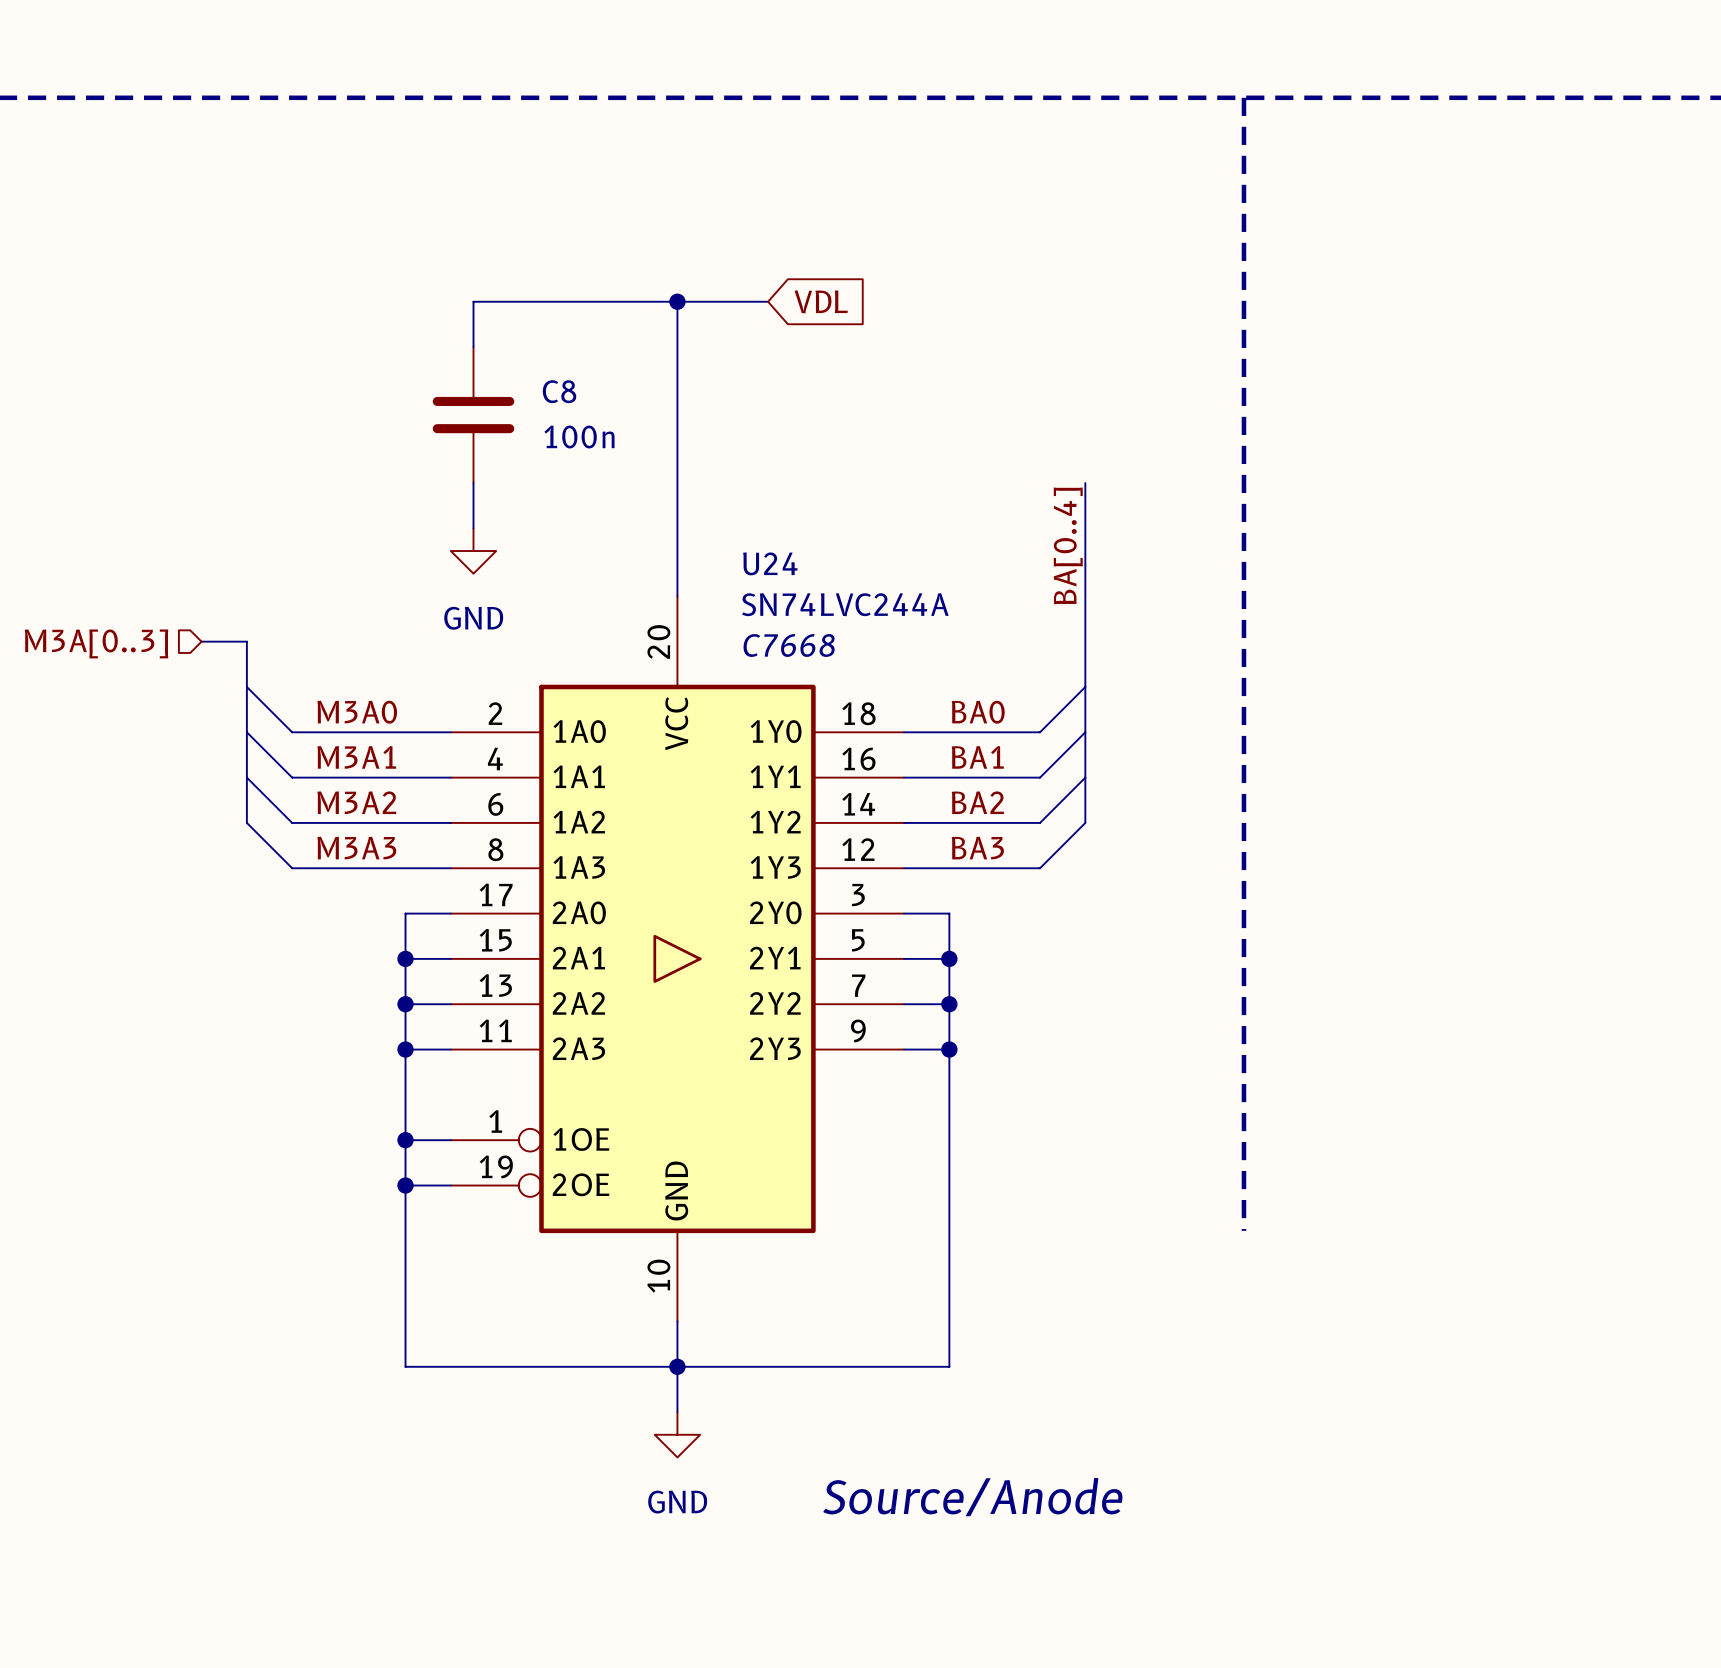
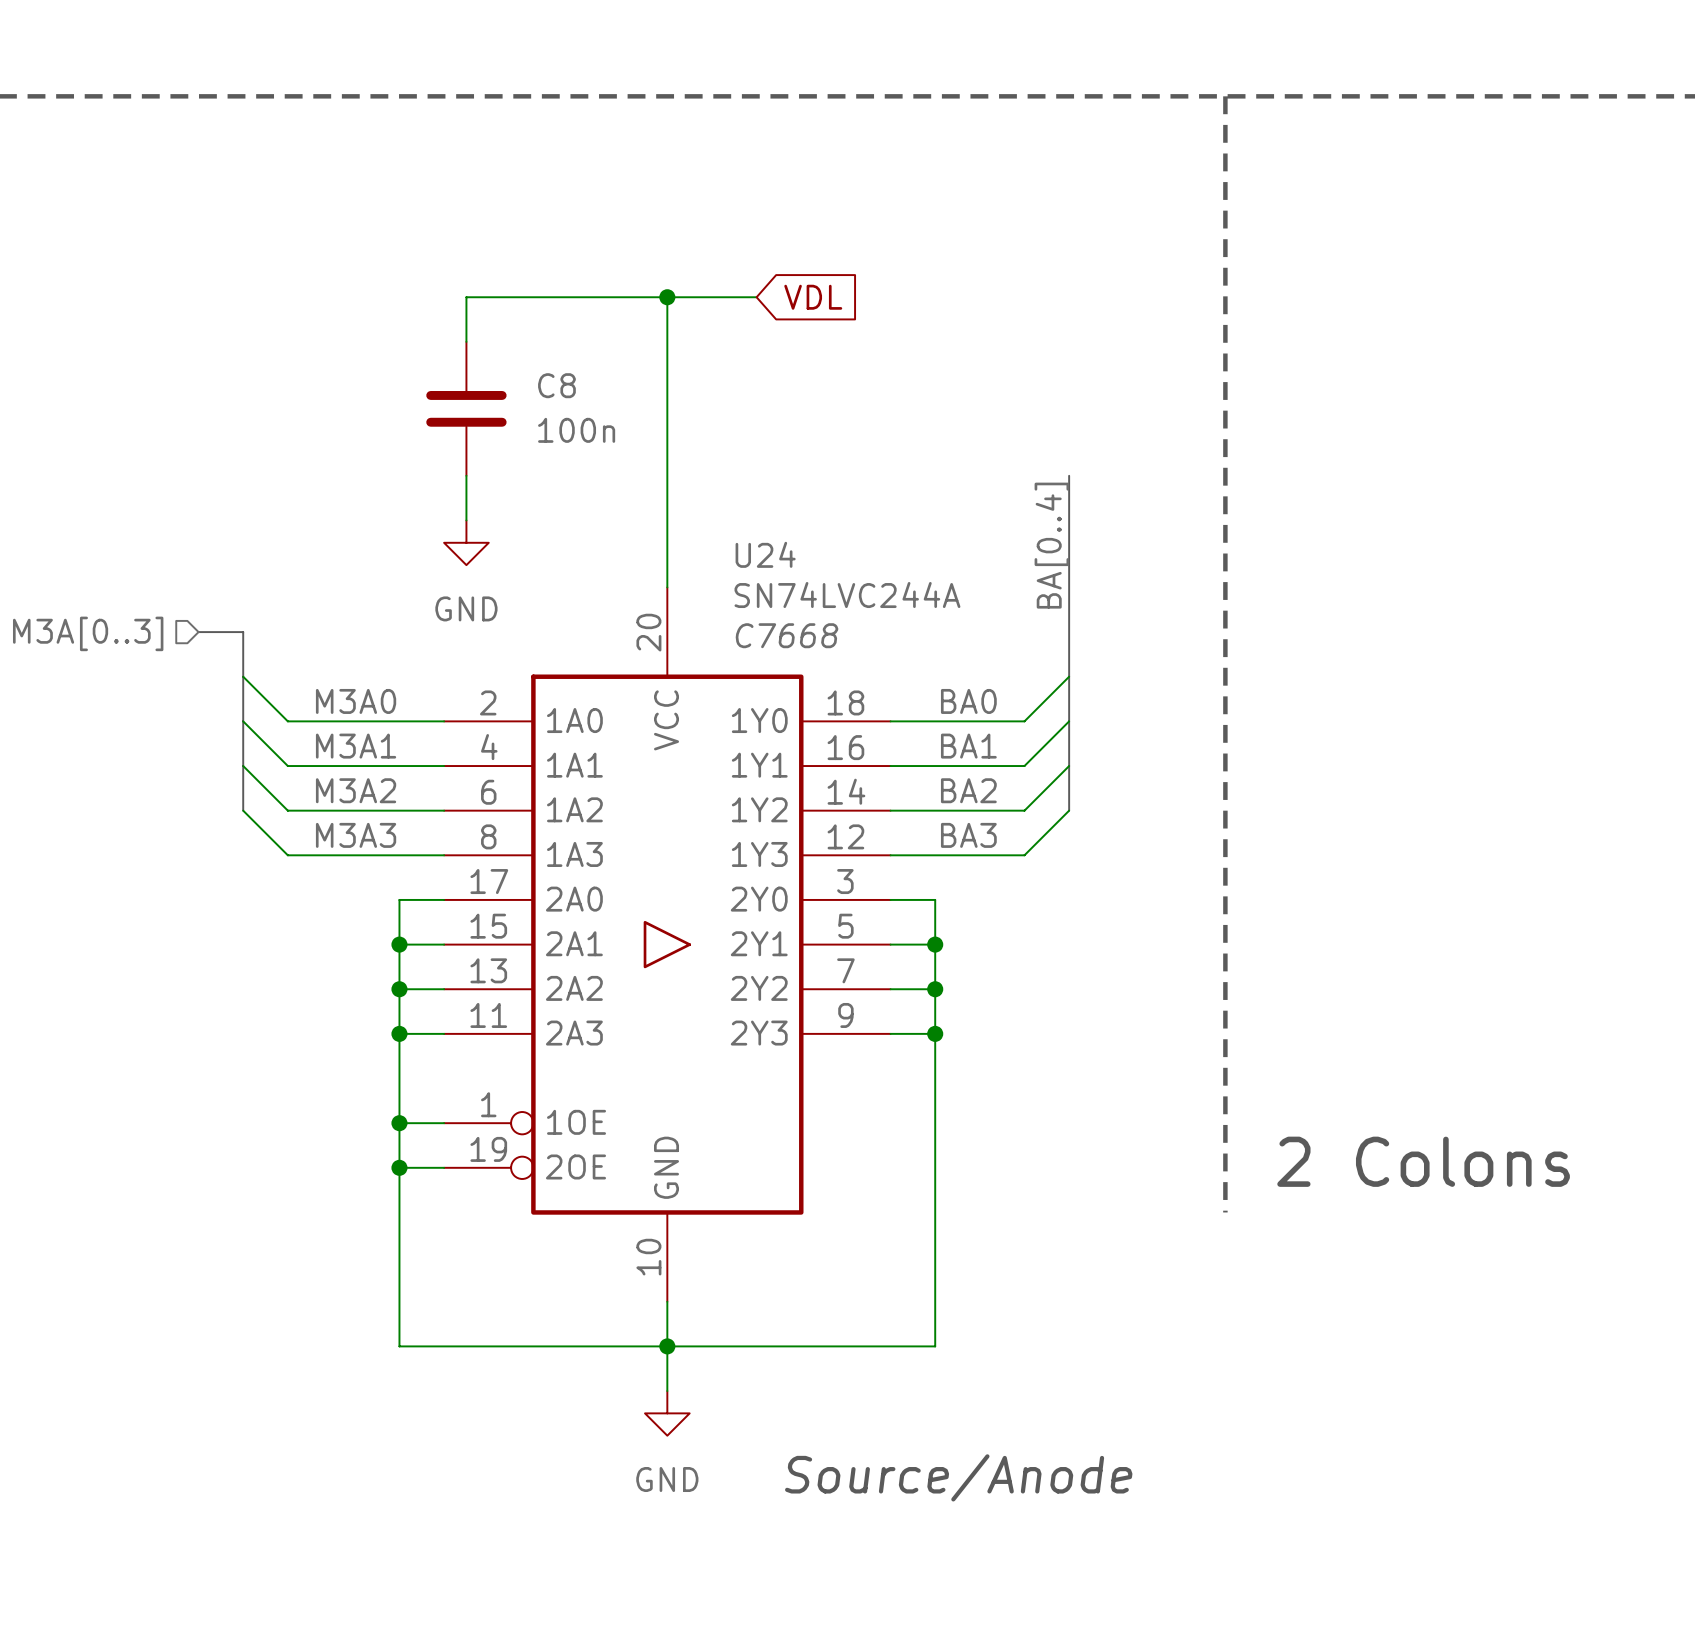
text: none -> 2 Colons (1423, 1161)

